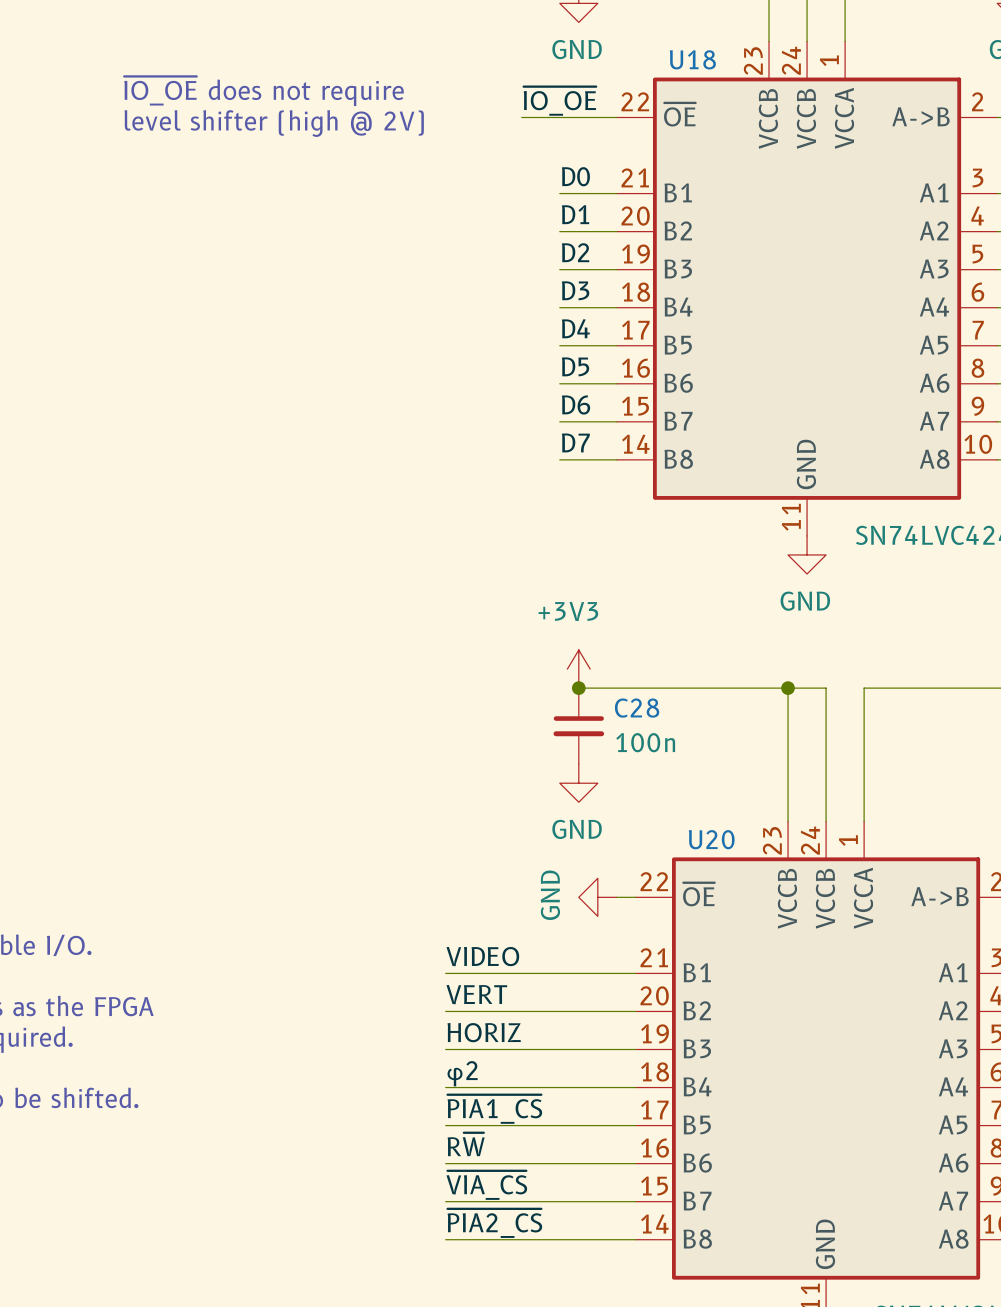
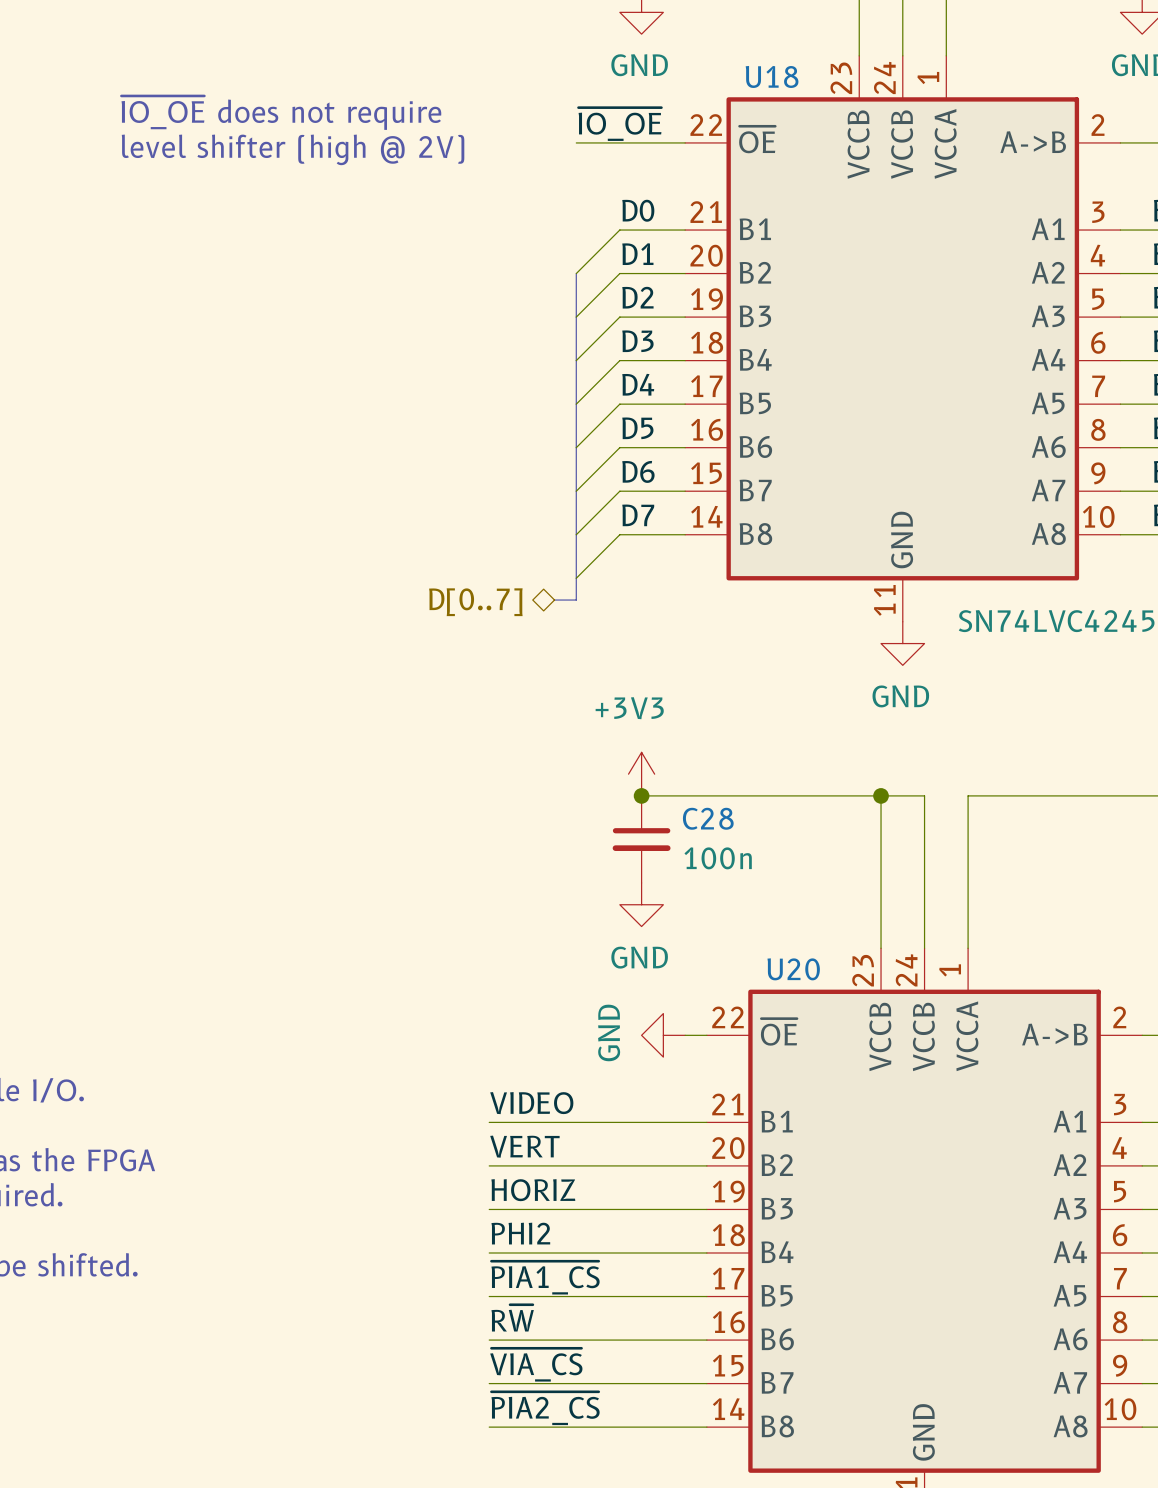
wire: none -> (619, 230) (576, 273)
bus: none -> (576, 273) (576, 600) (554, 600)
wire: none -> (619, 273) (576, 317)
wire: none -> (619, 317) (576, 360)
wire: none -> (619, 360) (576, 404)
wire: none -> (619, 404) (576, 447)
wire: none -> (619, 447) (576, 491)
wire: none -> (619, 491) (576, 534)
wire: none -> (619, 534) (576, 578)
hierarchical label: none -> D[0..7] (475, 602)
label: ϕ2 (462, 1073) -> PHI2 (520, 1233)

